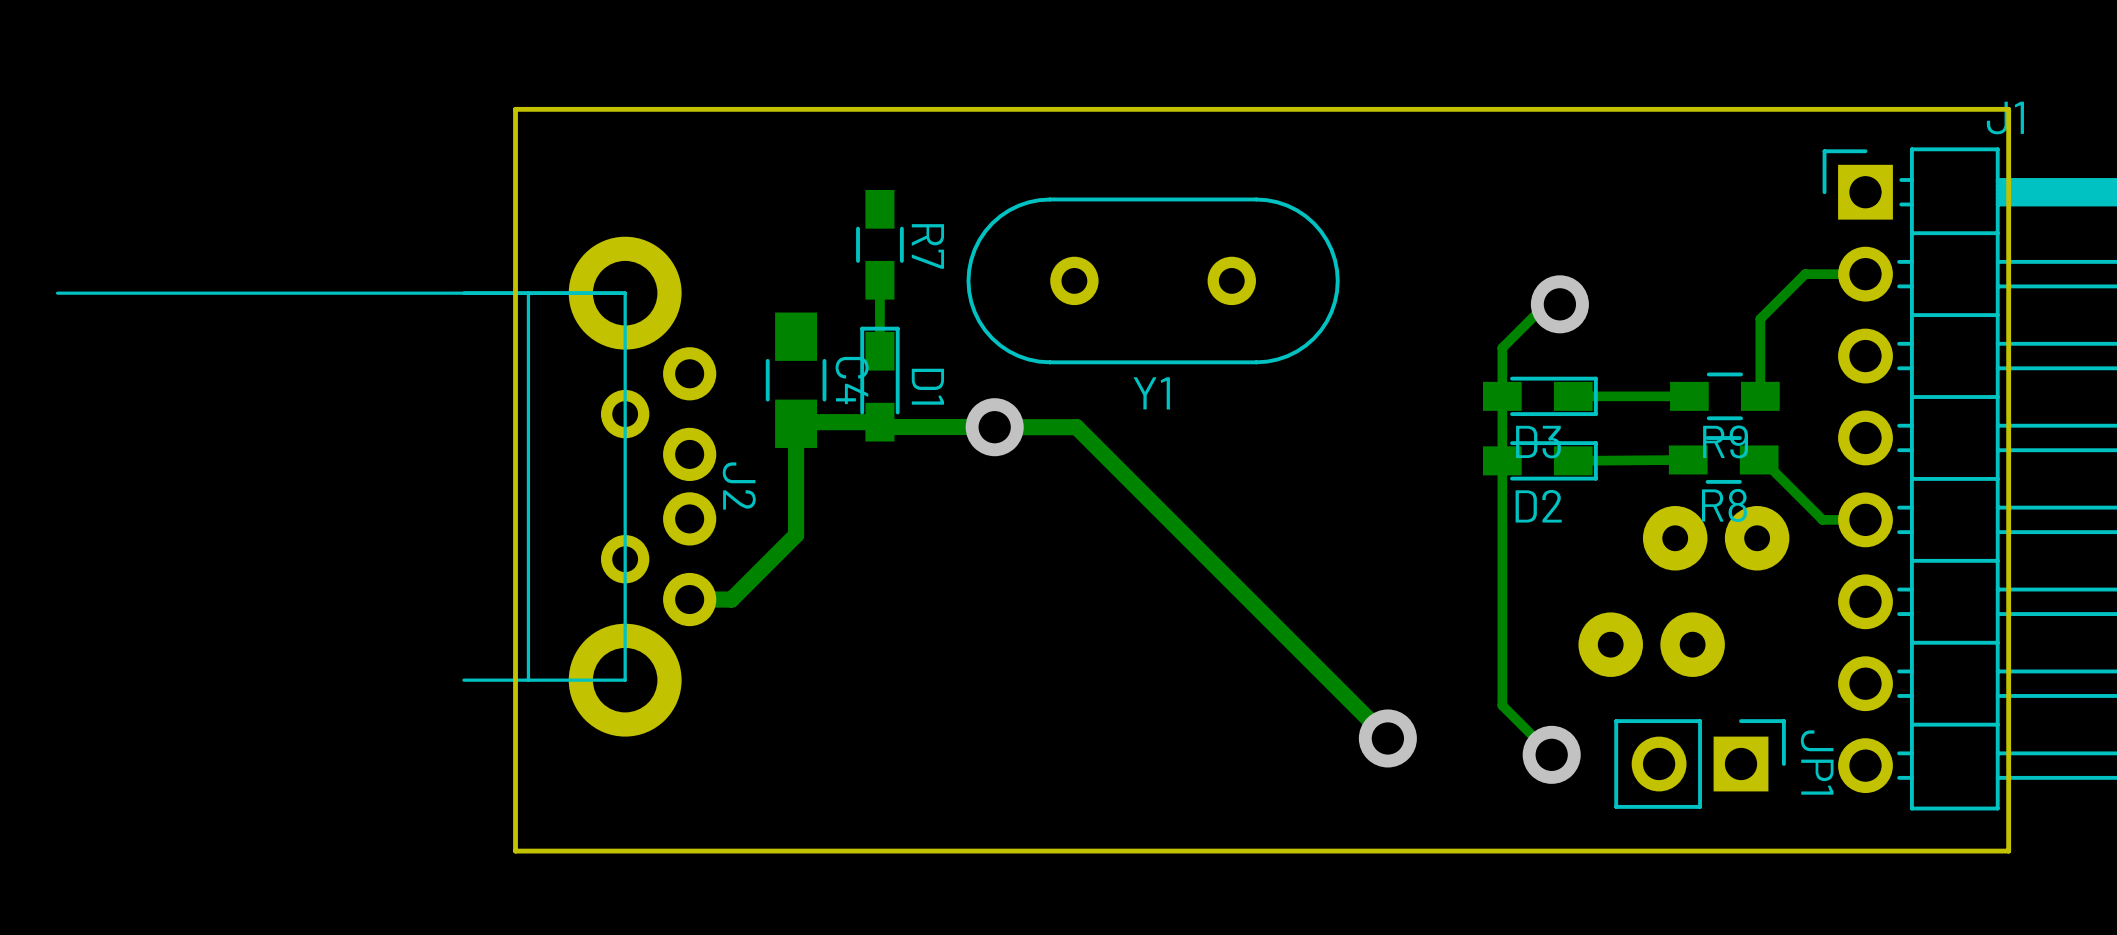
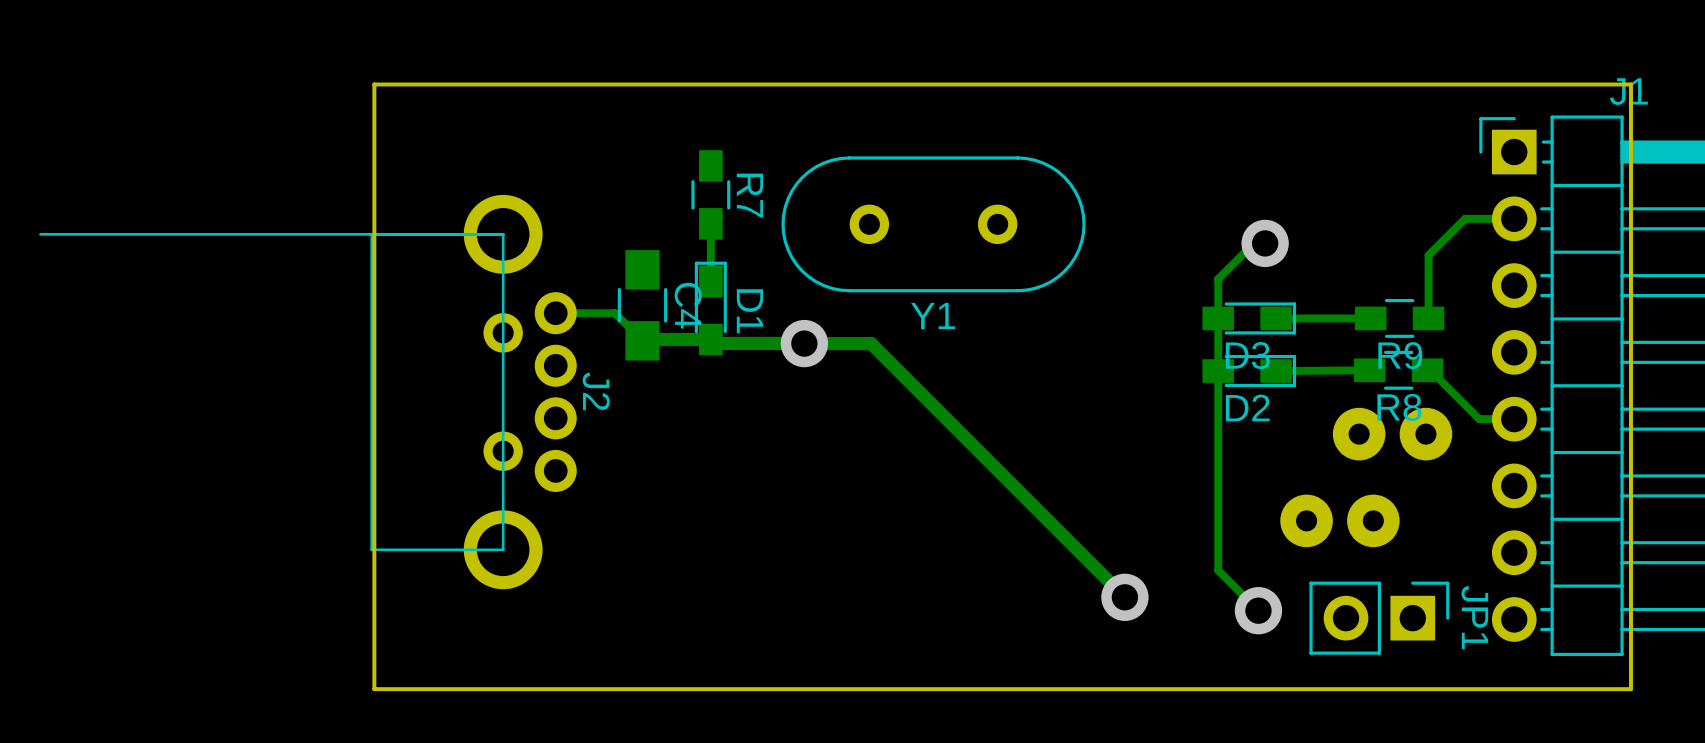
board edge: (515, 109) (515, 851) -> (413, 84) (374, 84) (374, 689) (413, 689)
J2 footprint: [55, 236, 717, 737] -> [39, 194, 577, 590]
track: (796, 423) (796, 535) (731, 599) (689, 599) -> (642, 340) (614, 313) (555, 313)

